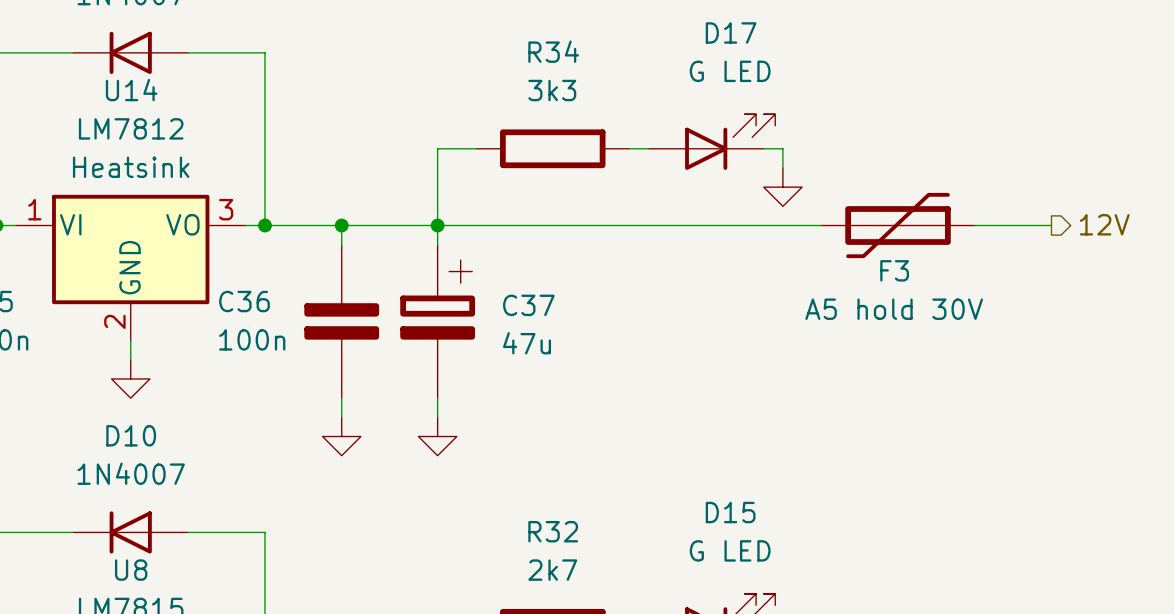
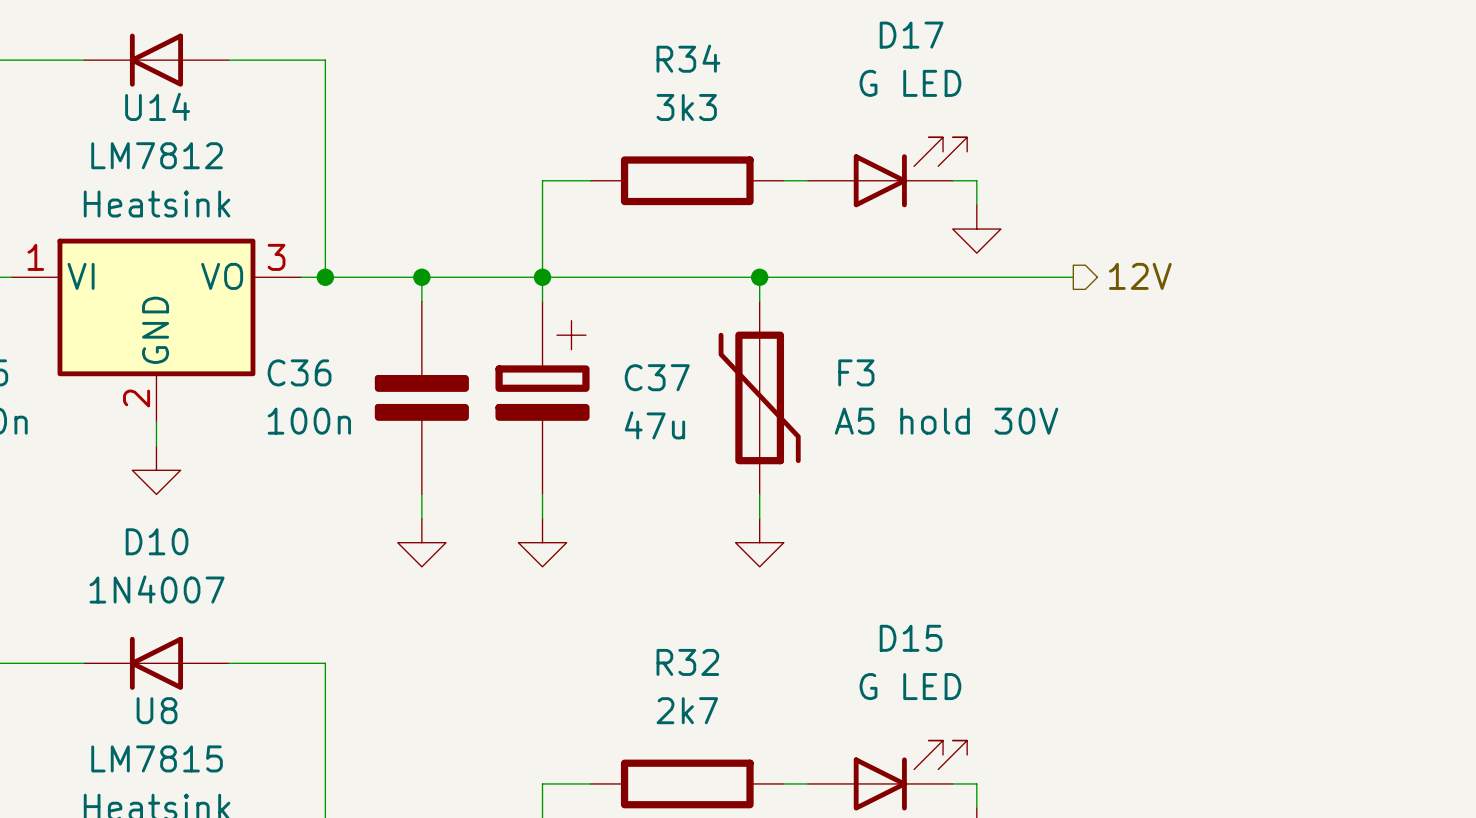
hierarchical label position: 12V (1104, 224) -> 12V (1140, 276)
wire: none -> (759, 277) (759, 301)
junction: none -> (759, 277)
F3 rotation: 0° (898, 225) -> 90° clockwise (759, 397)
F3 position: (898, 225) -> (759, 397)
wire: (974, 225) (1051, 225) -> none
F3 name position: F3 (894, 270) -> F3 (856, 372)
F3 value position: A5 hold 30V (894, 309) -> A5 hold 30V (946, 421)
wire: none -> (759, 494) (759, 518)
power symbol: none -> (759, 542)

